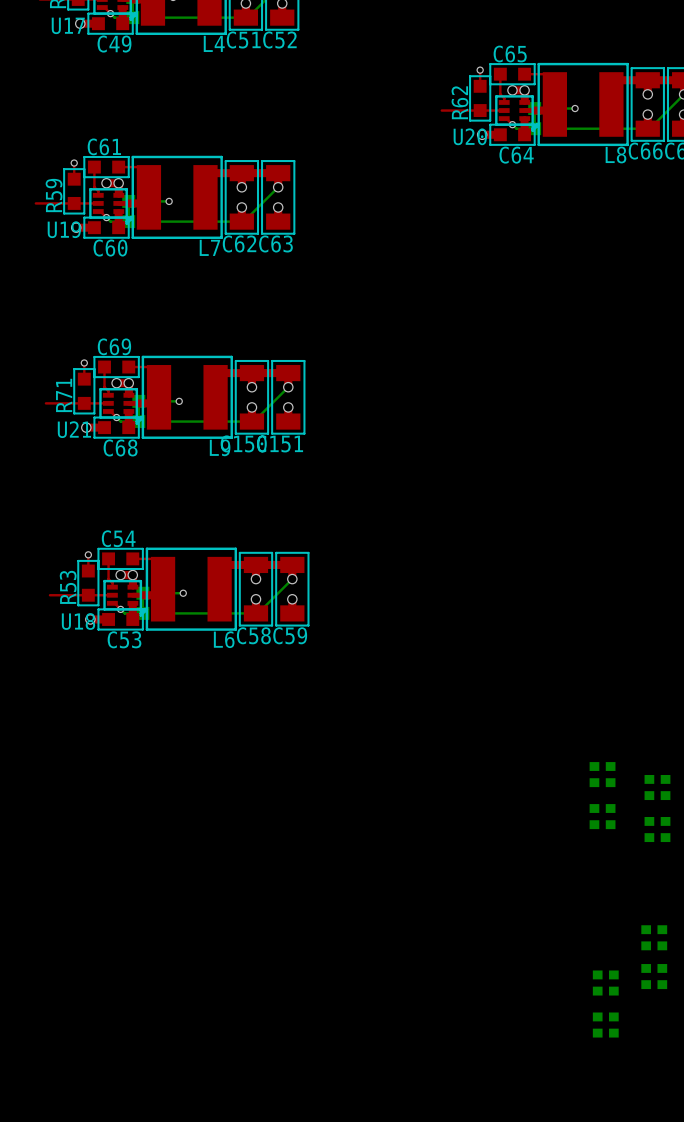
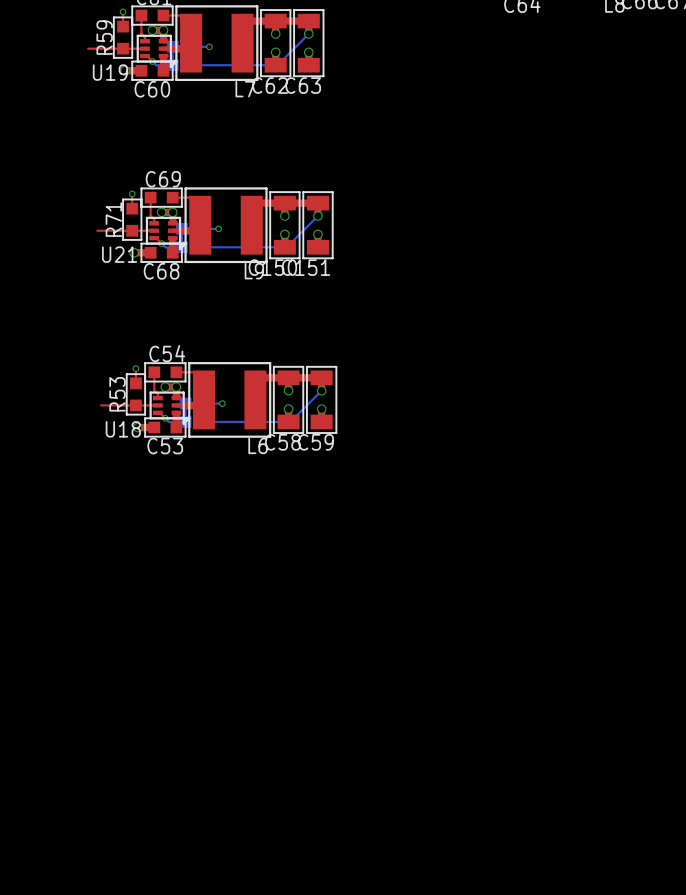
part: (602, 766) -> none
part: (657, 779) -> none
part: (602, 782) -> none
part: (657, 795) -> none
part: (602, 808) -> none
part: (657, 821) -> none
part: (602, 824) -> none
part: (657, 837) -> none
part: (654, 929) -> none
part: (654, 945) -> none
part: (654, 968) -> none
part: (605, 974) -> none
part: (654, 984) -> none
part: (605, 991) -> none
part: (605, 1016) -> none
part: (605, 1033) -> none

